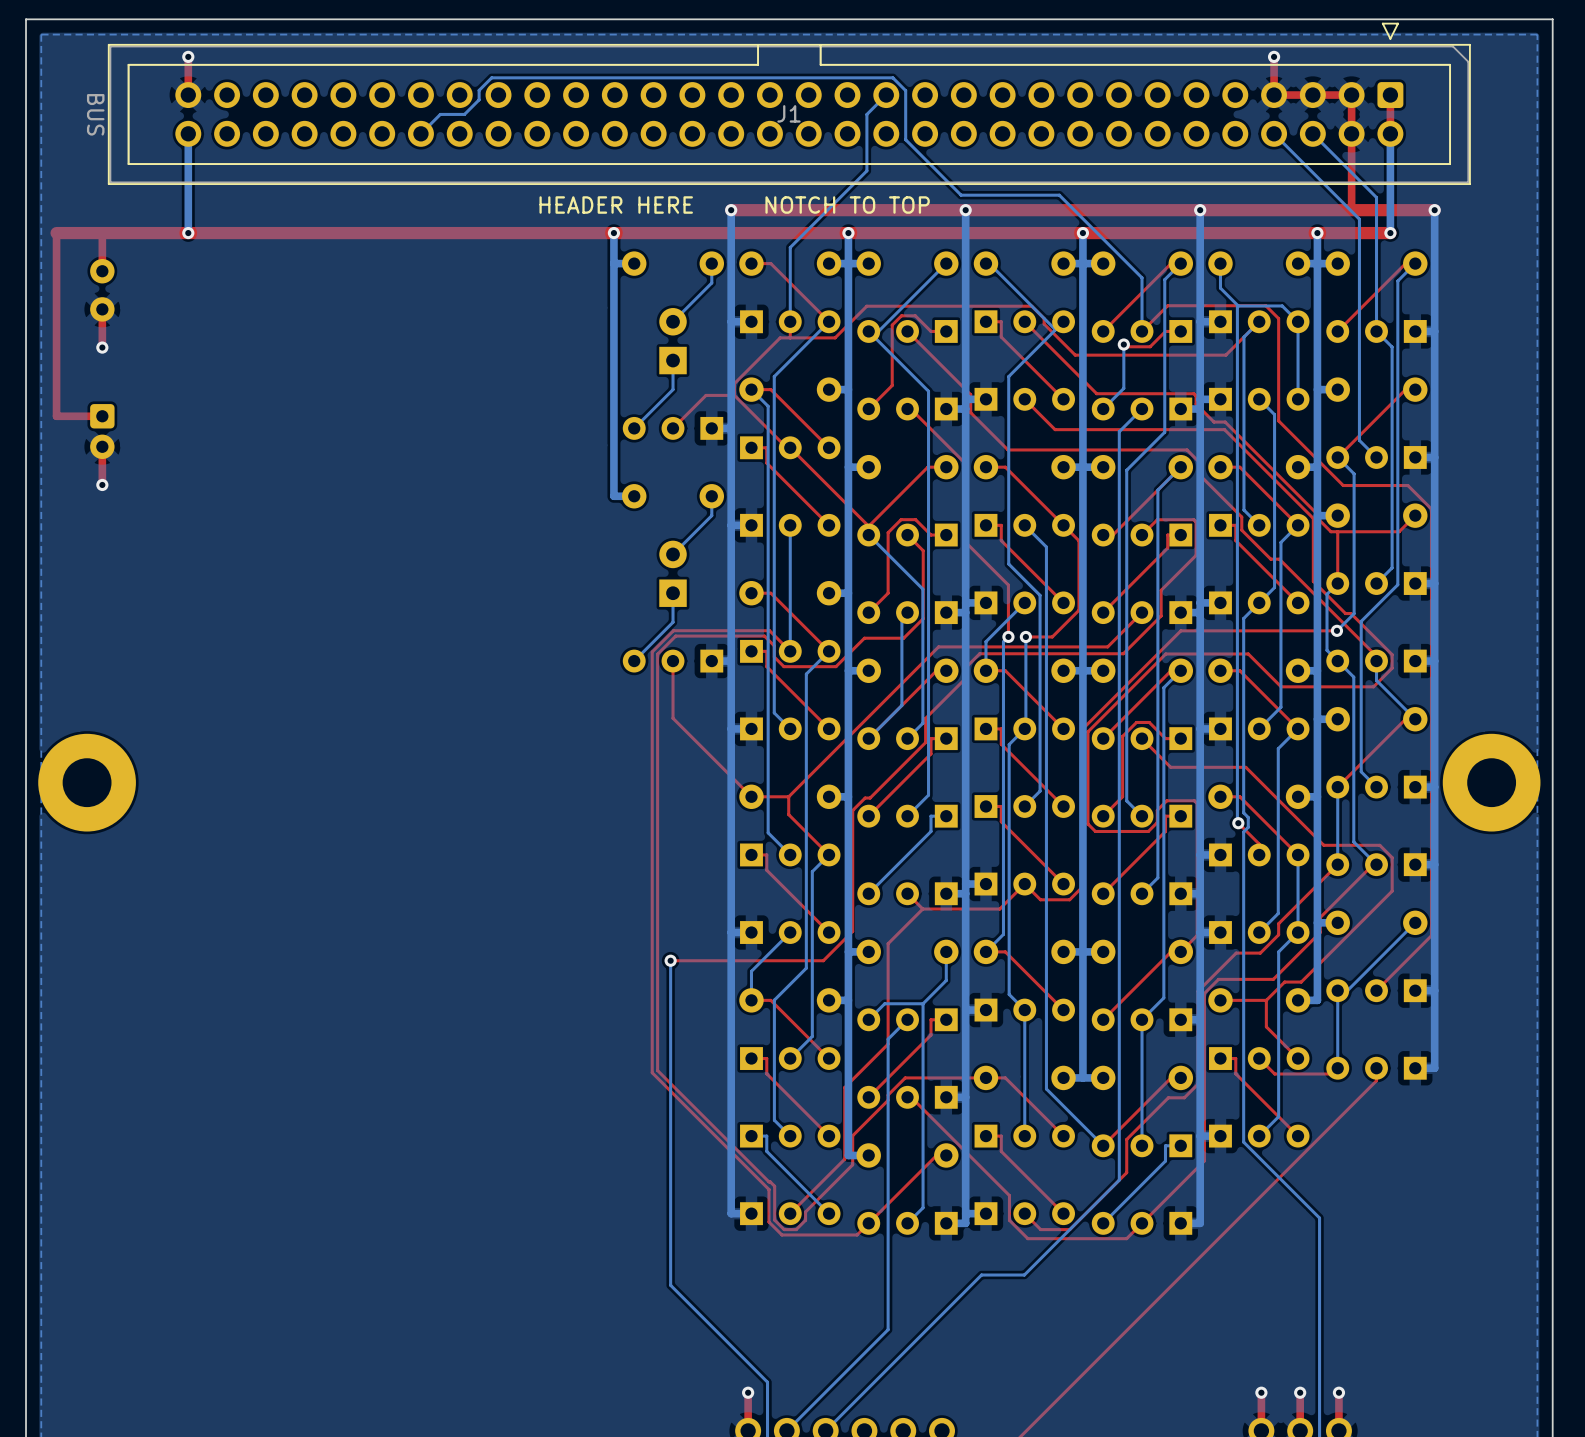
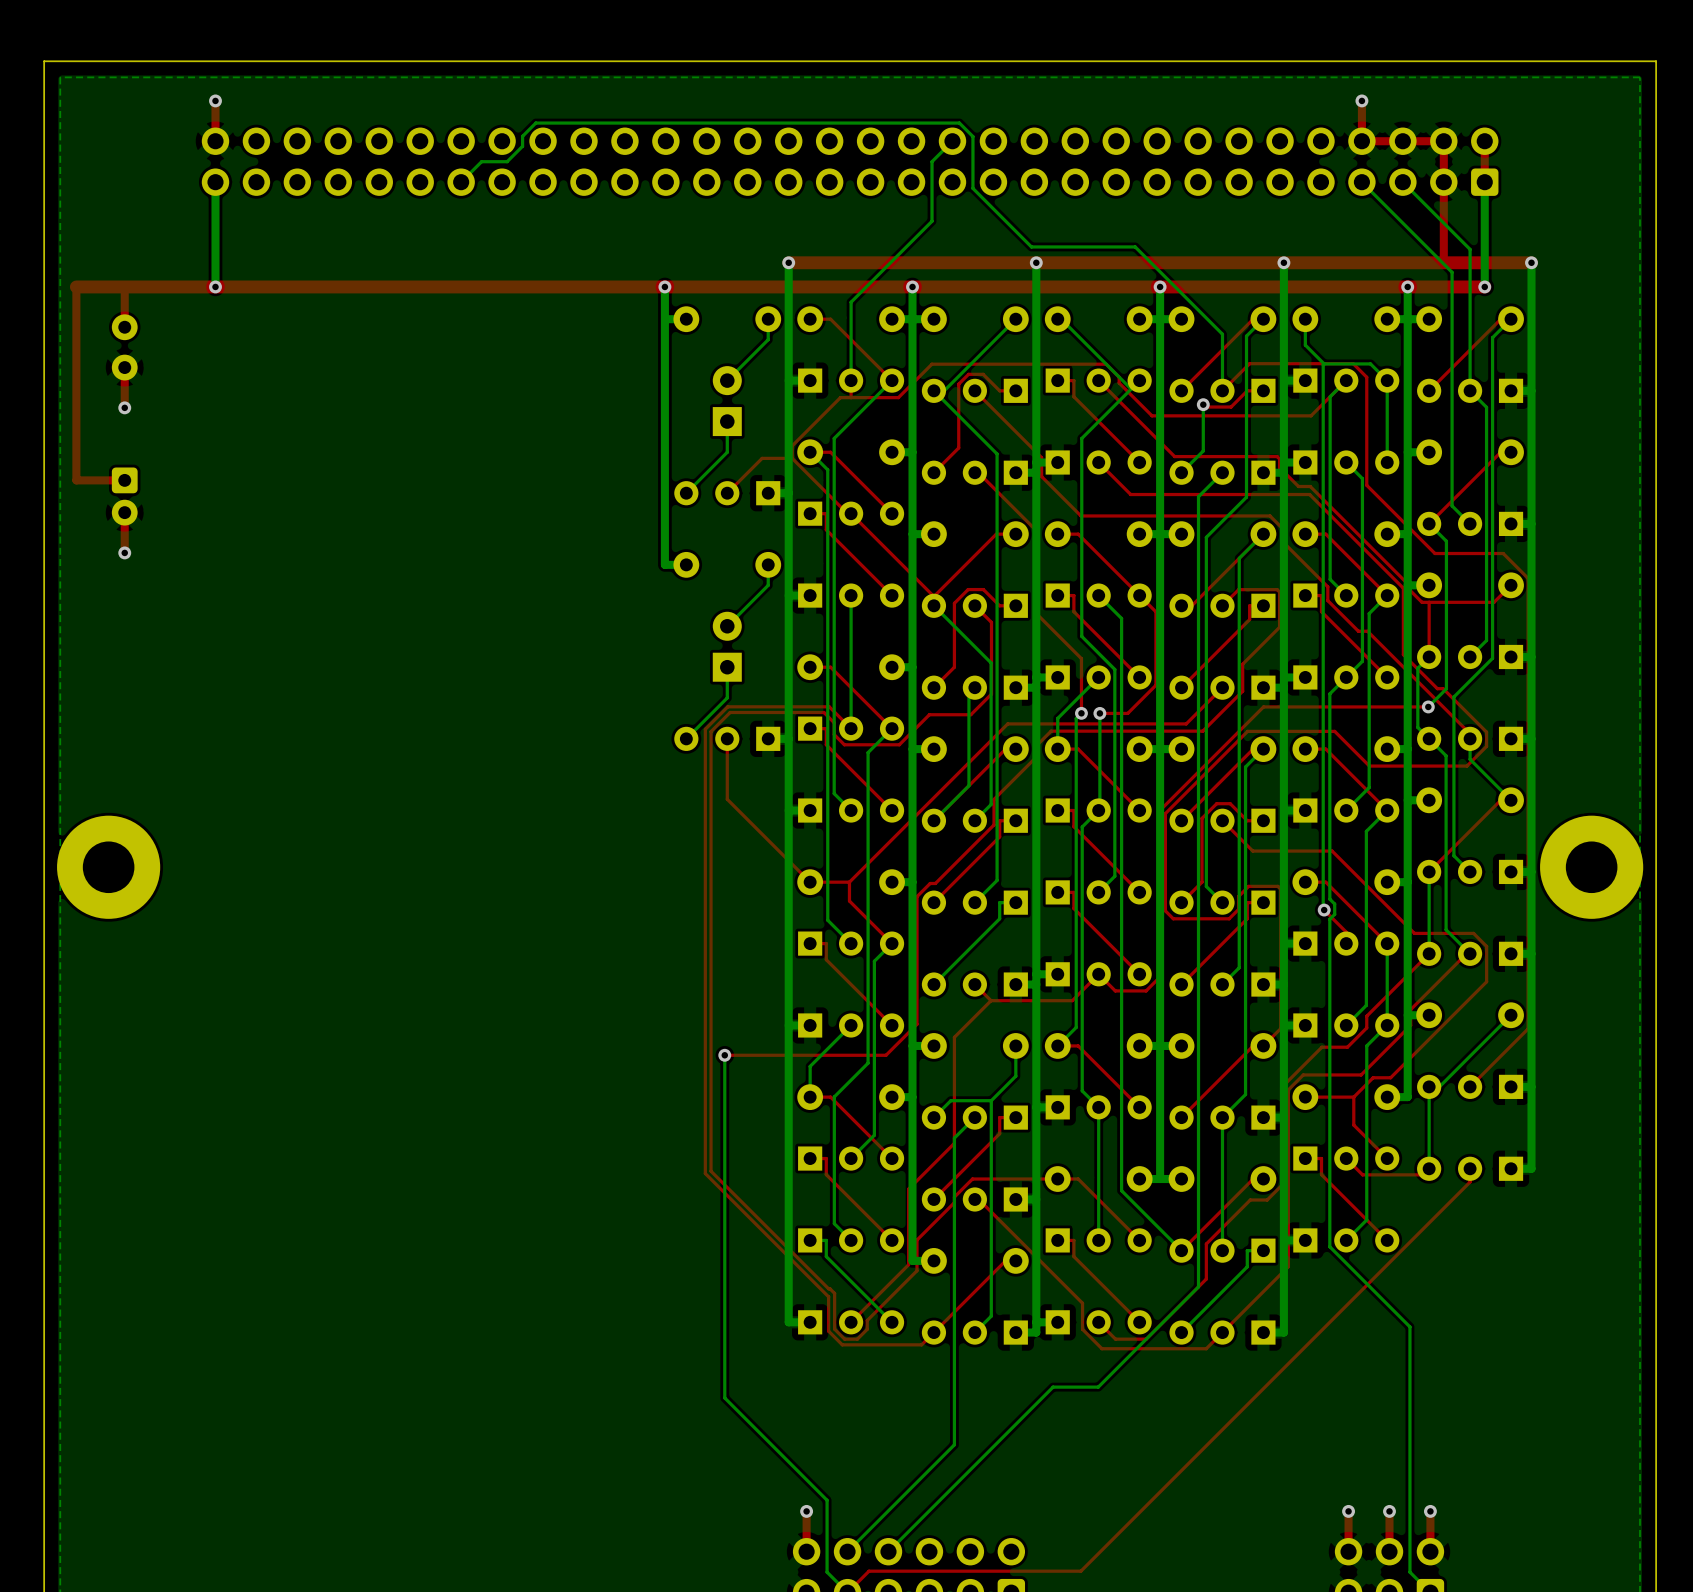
J1 side: bottom (789, 103) -> top (850, 161)
text: HEADER HERE (616, 205) -> none
text: NOTCH TO TOP (847, 205) -> none

